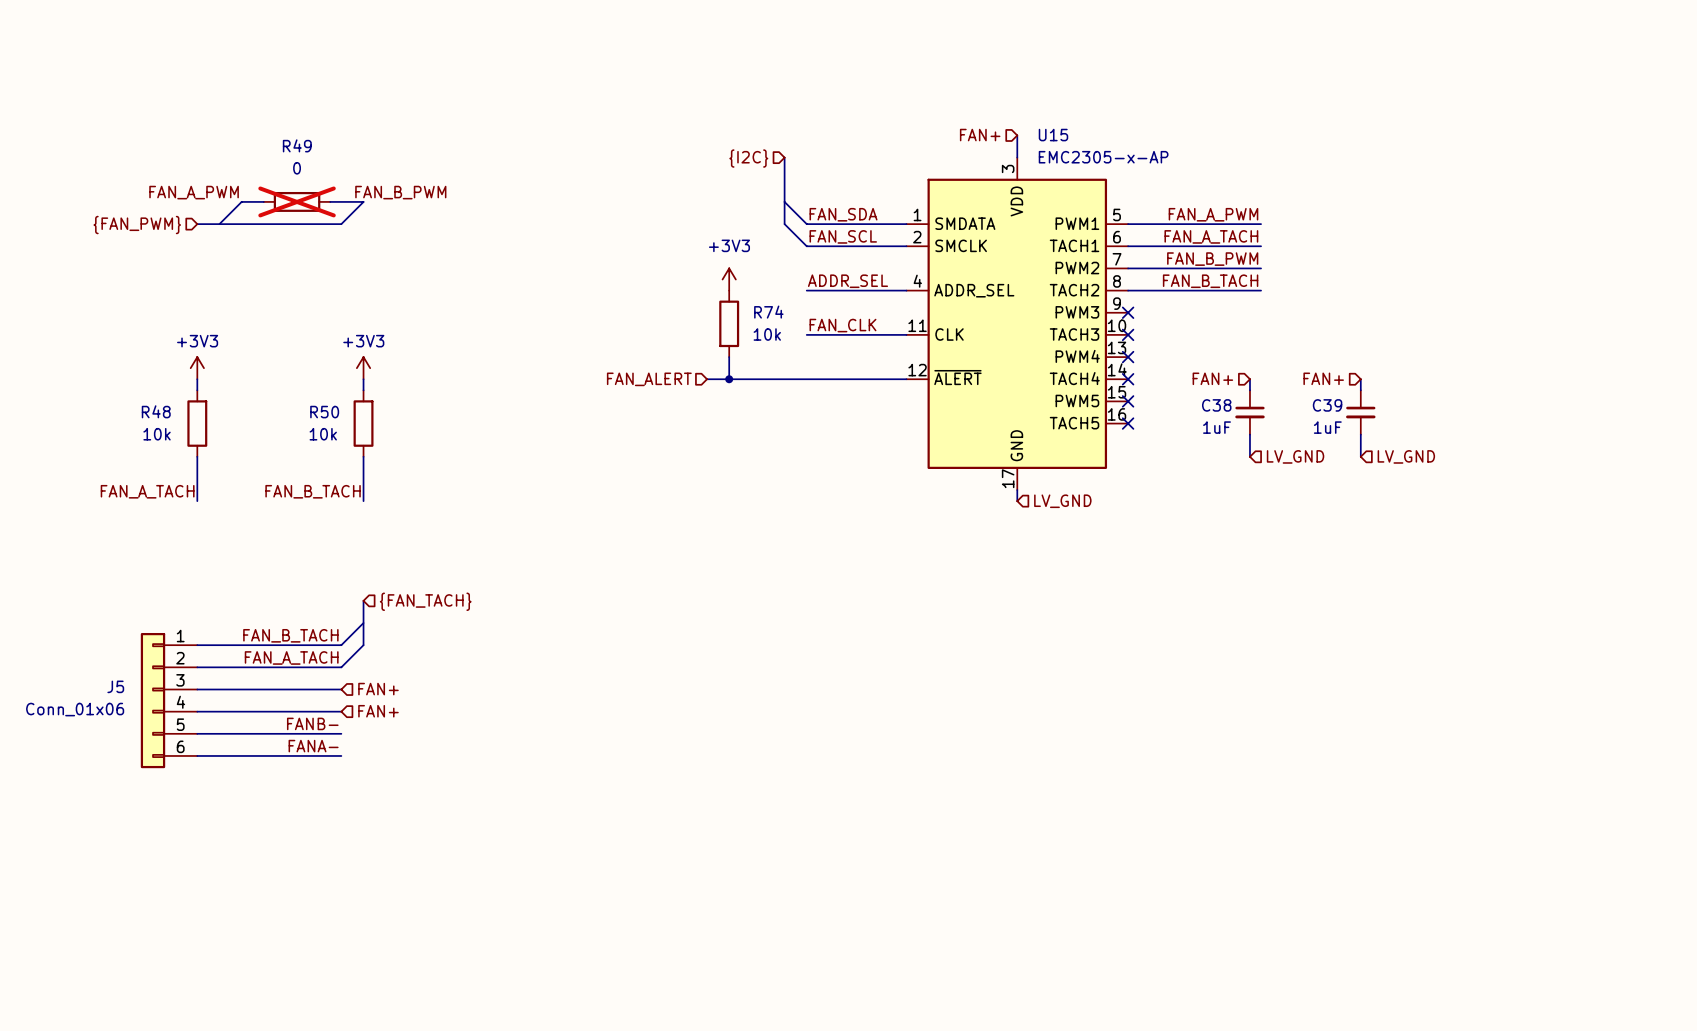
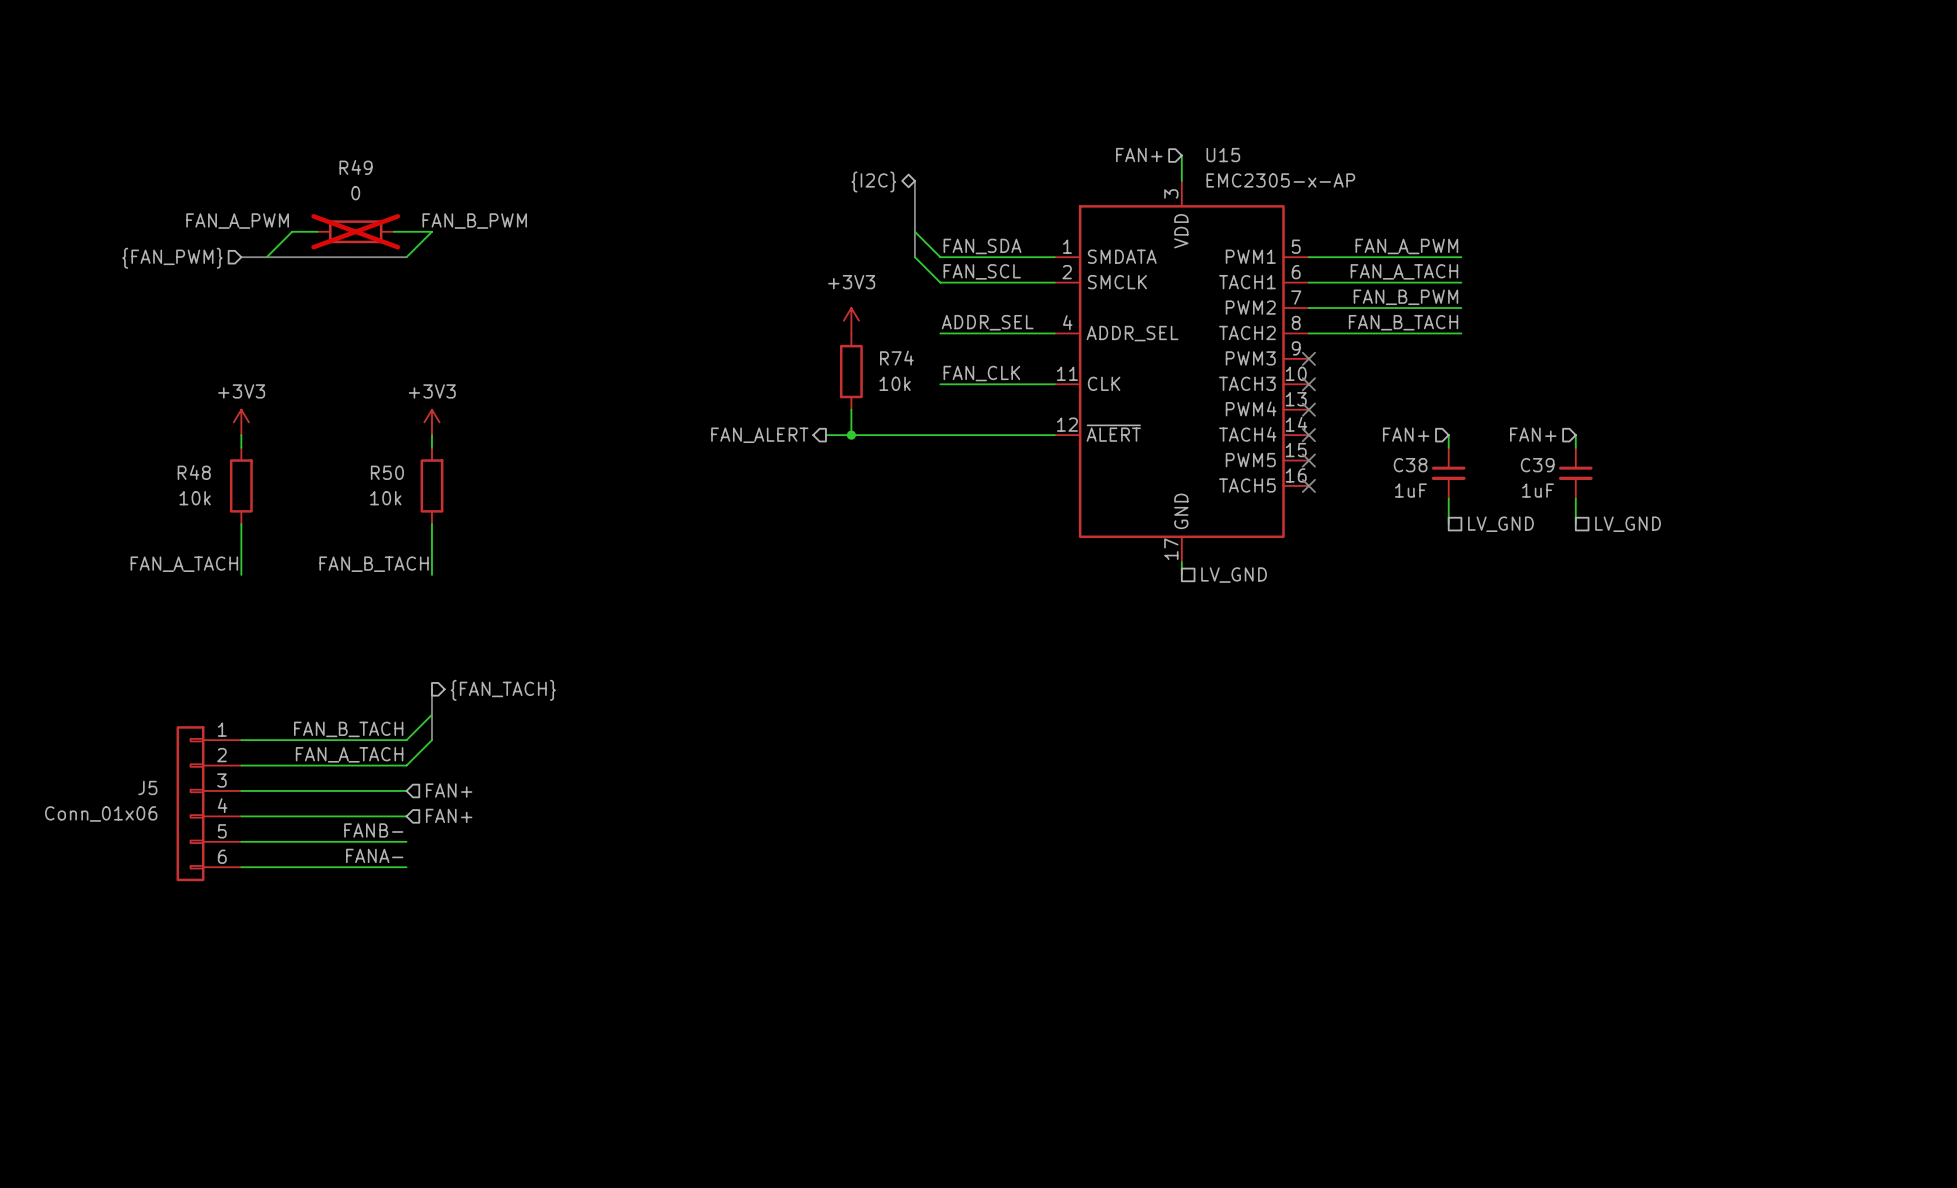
hierarchical label shape: input (748, 158) -> bidirectional (873, 181)
hierarchical label shape: input (649, 379) -> output (759, 435)
hierarchical label shape: input (1295, 456) -> passive (1500, 524)
hierarchical label shape: input (1406, 456) -> passive (1628, 524)
hierarchical label shape: input (1062, 501) -> passive (1234, 575)
hierarchical label shape: input (425, 601) -> output (503, 690)

